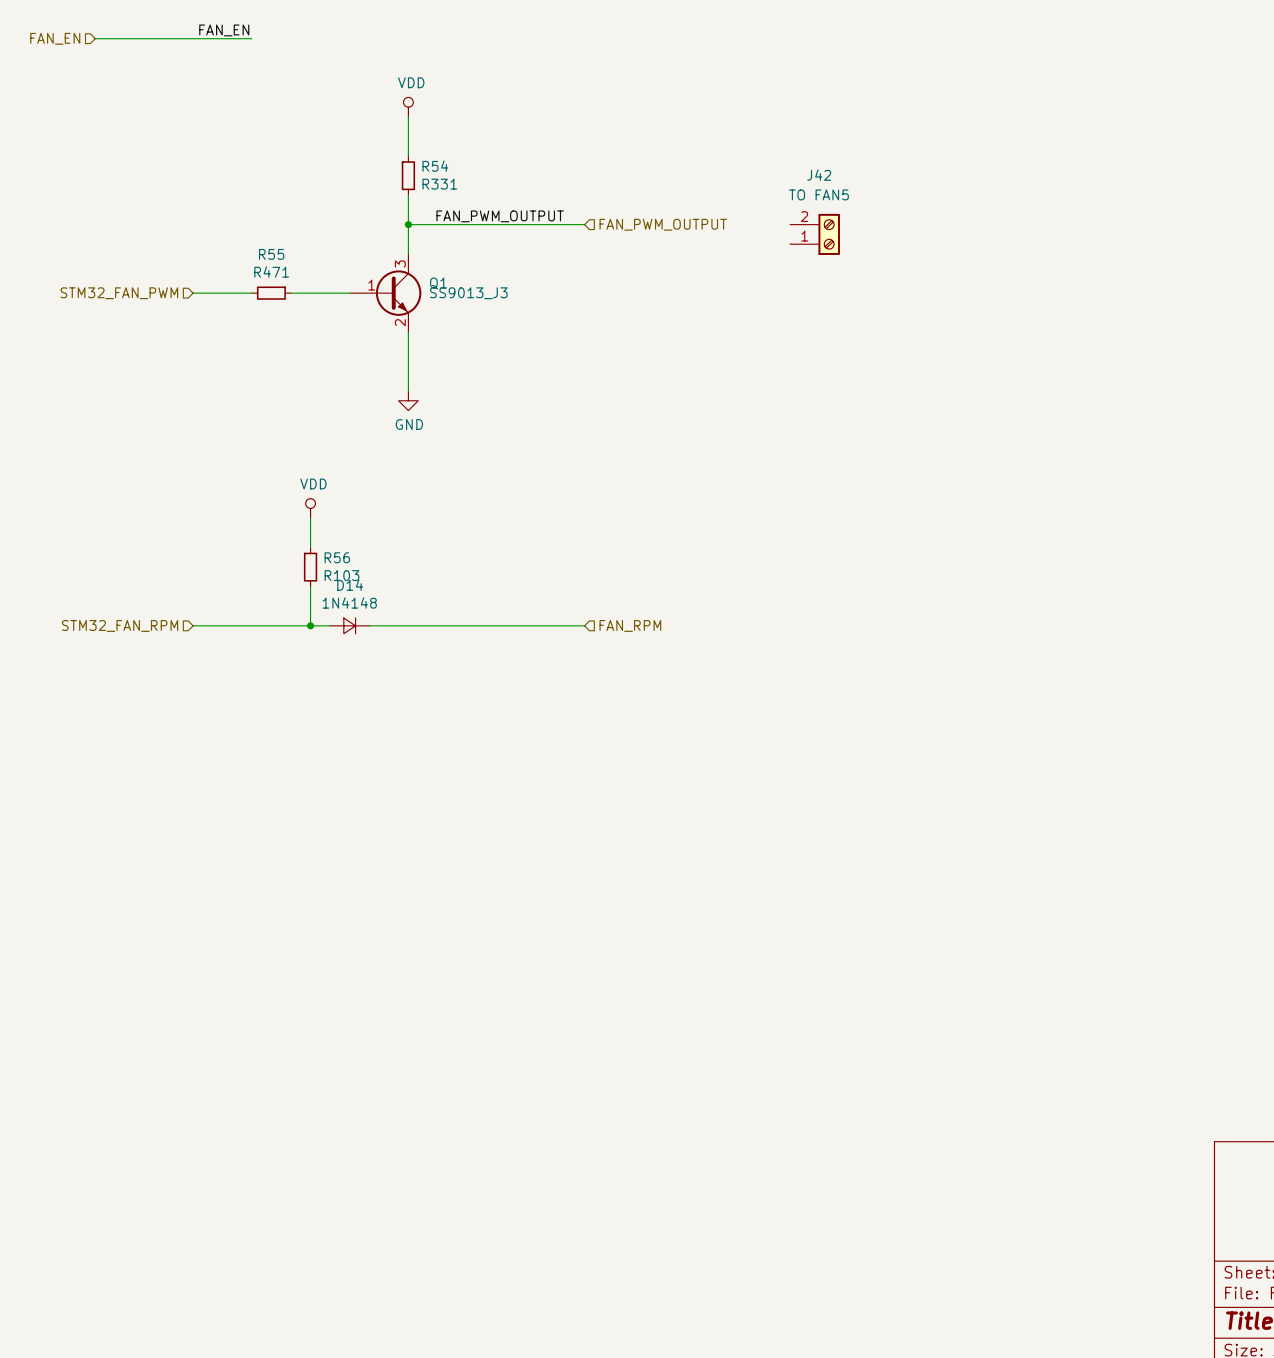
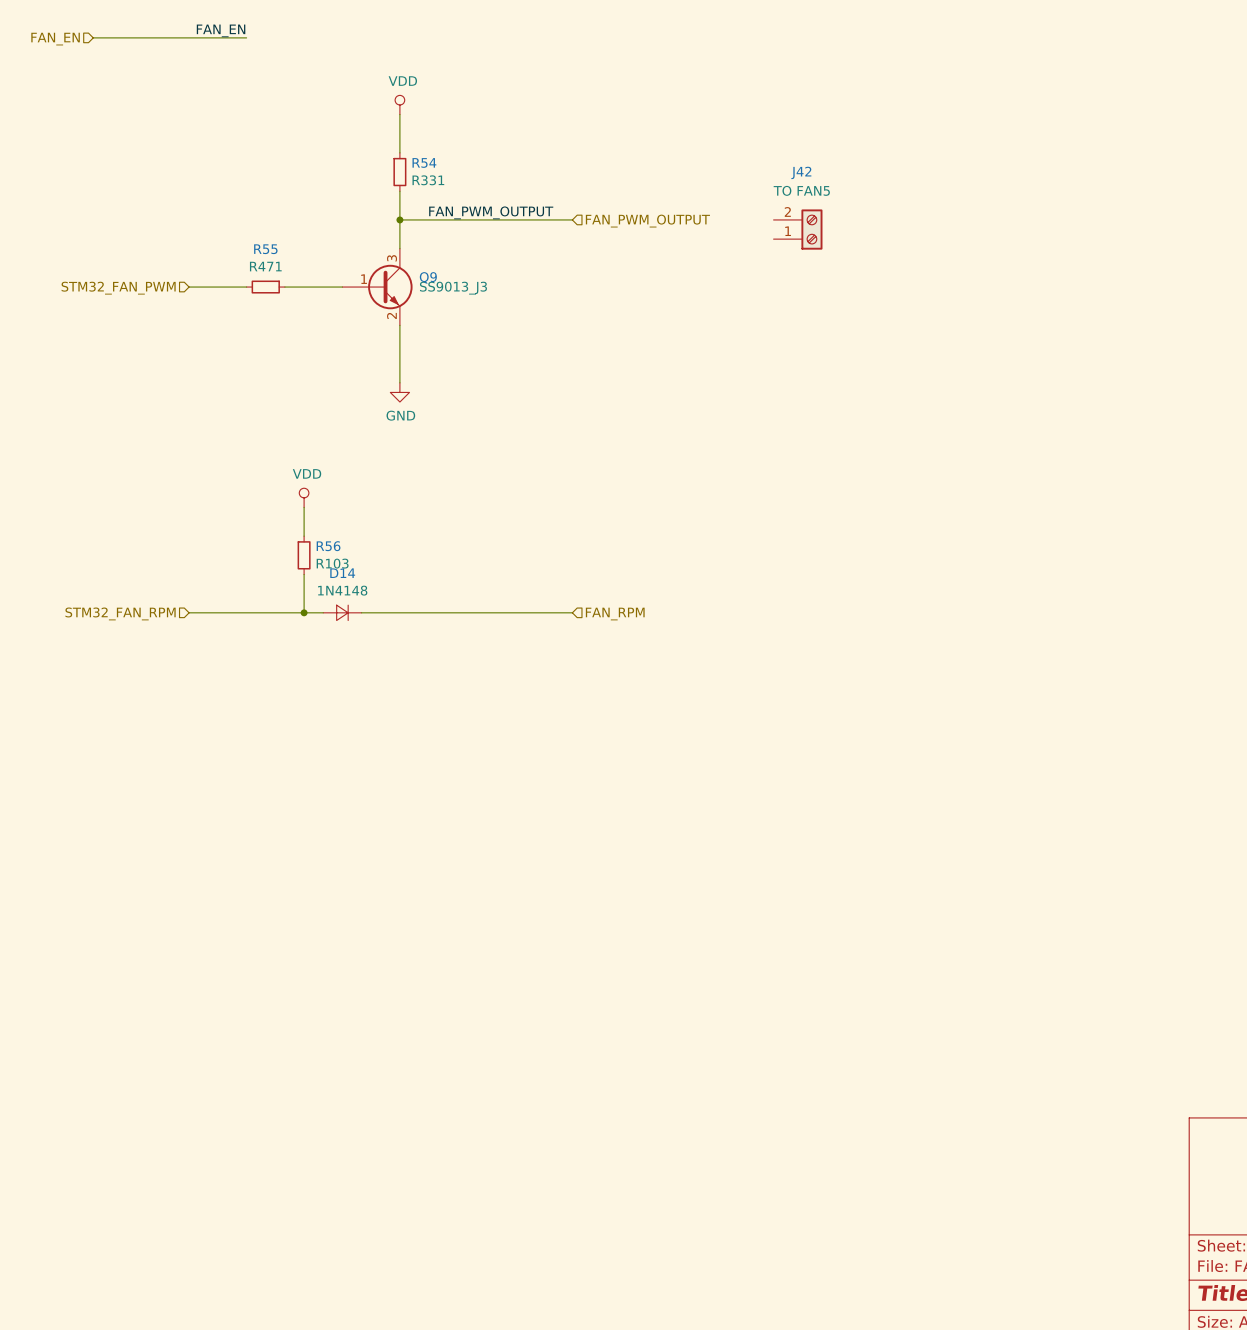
Q1 name: Q1 (438, 283) -> Q9 (428, 277)

